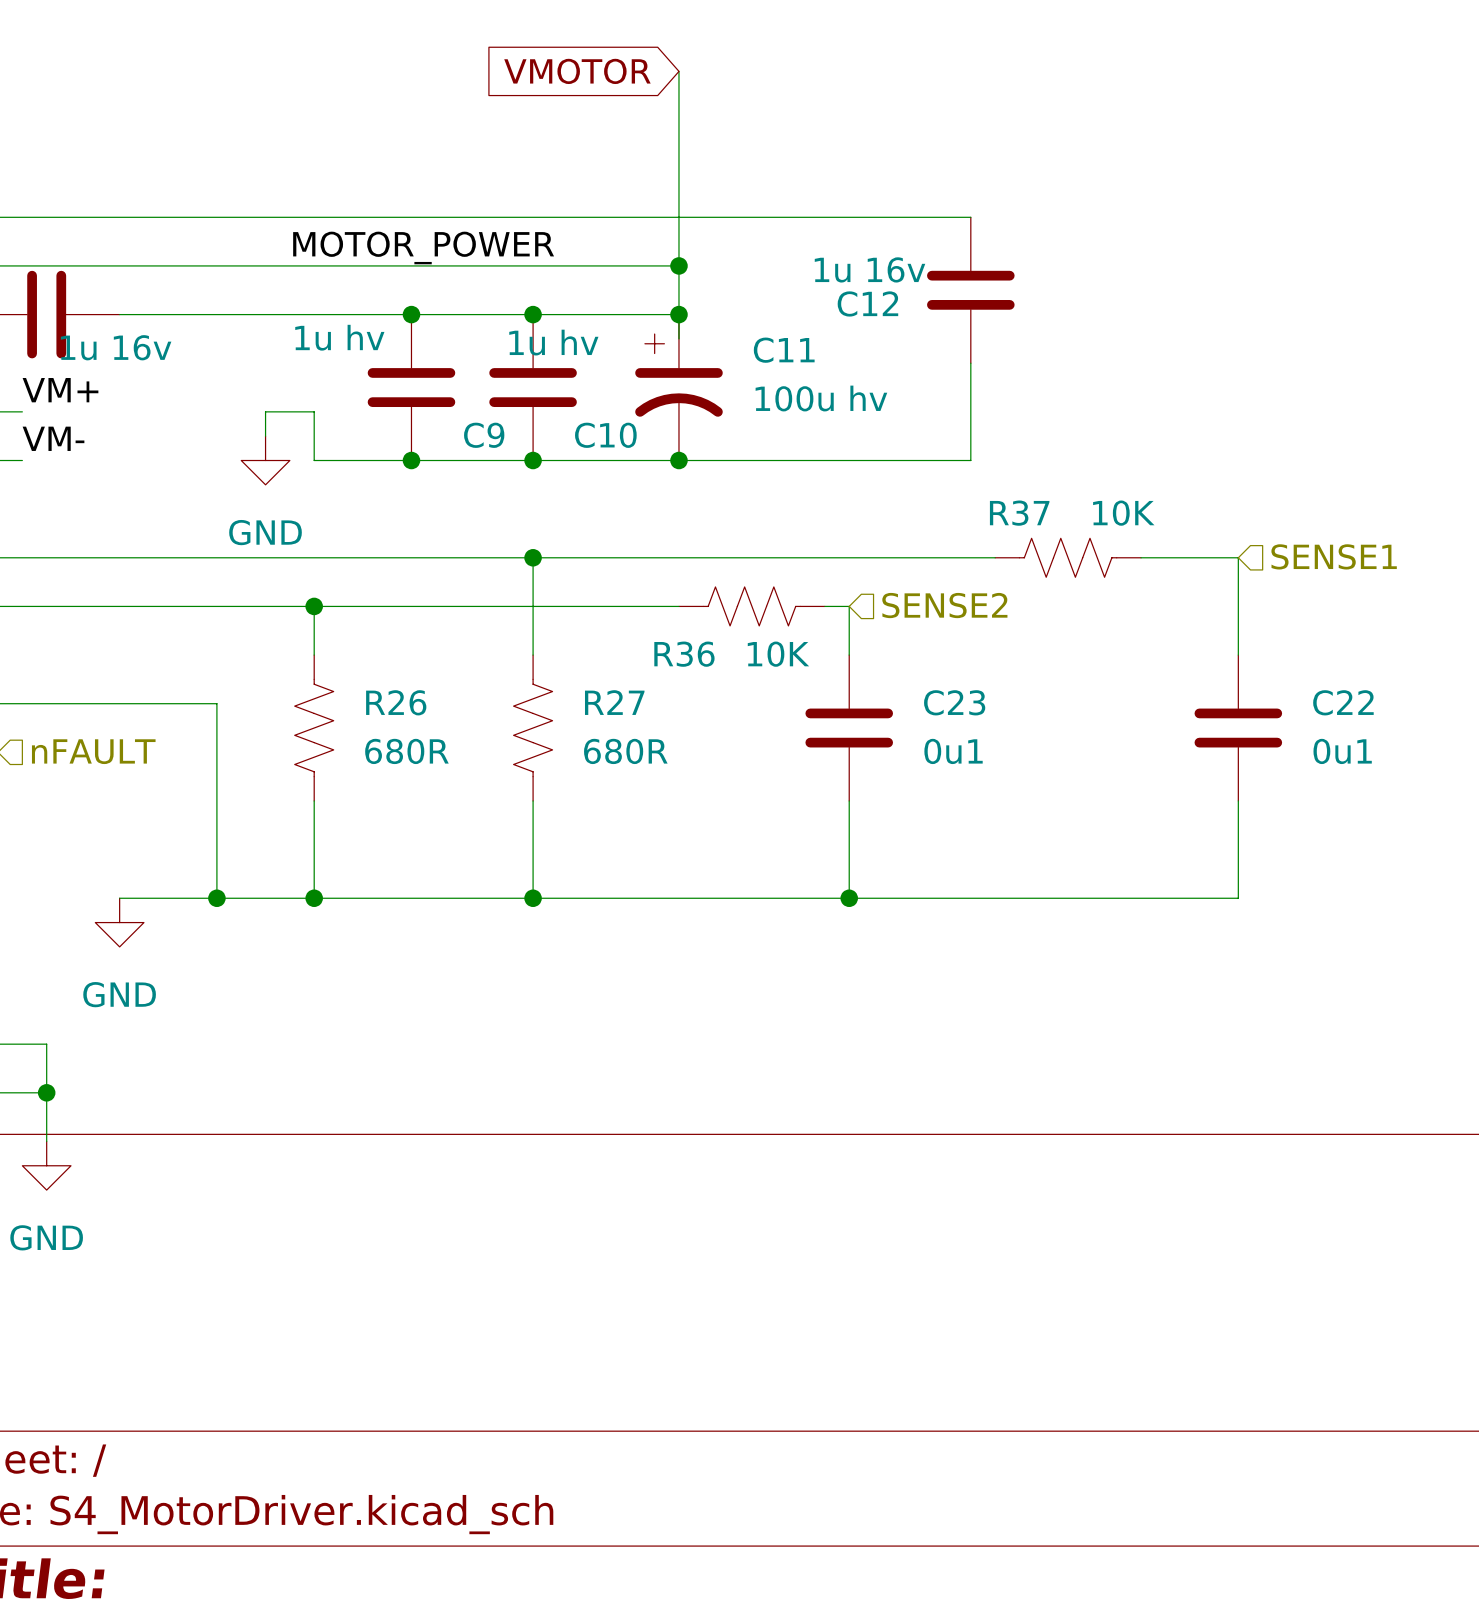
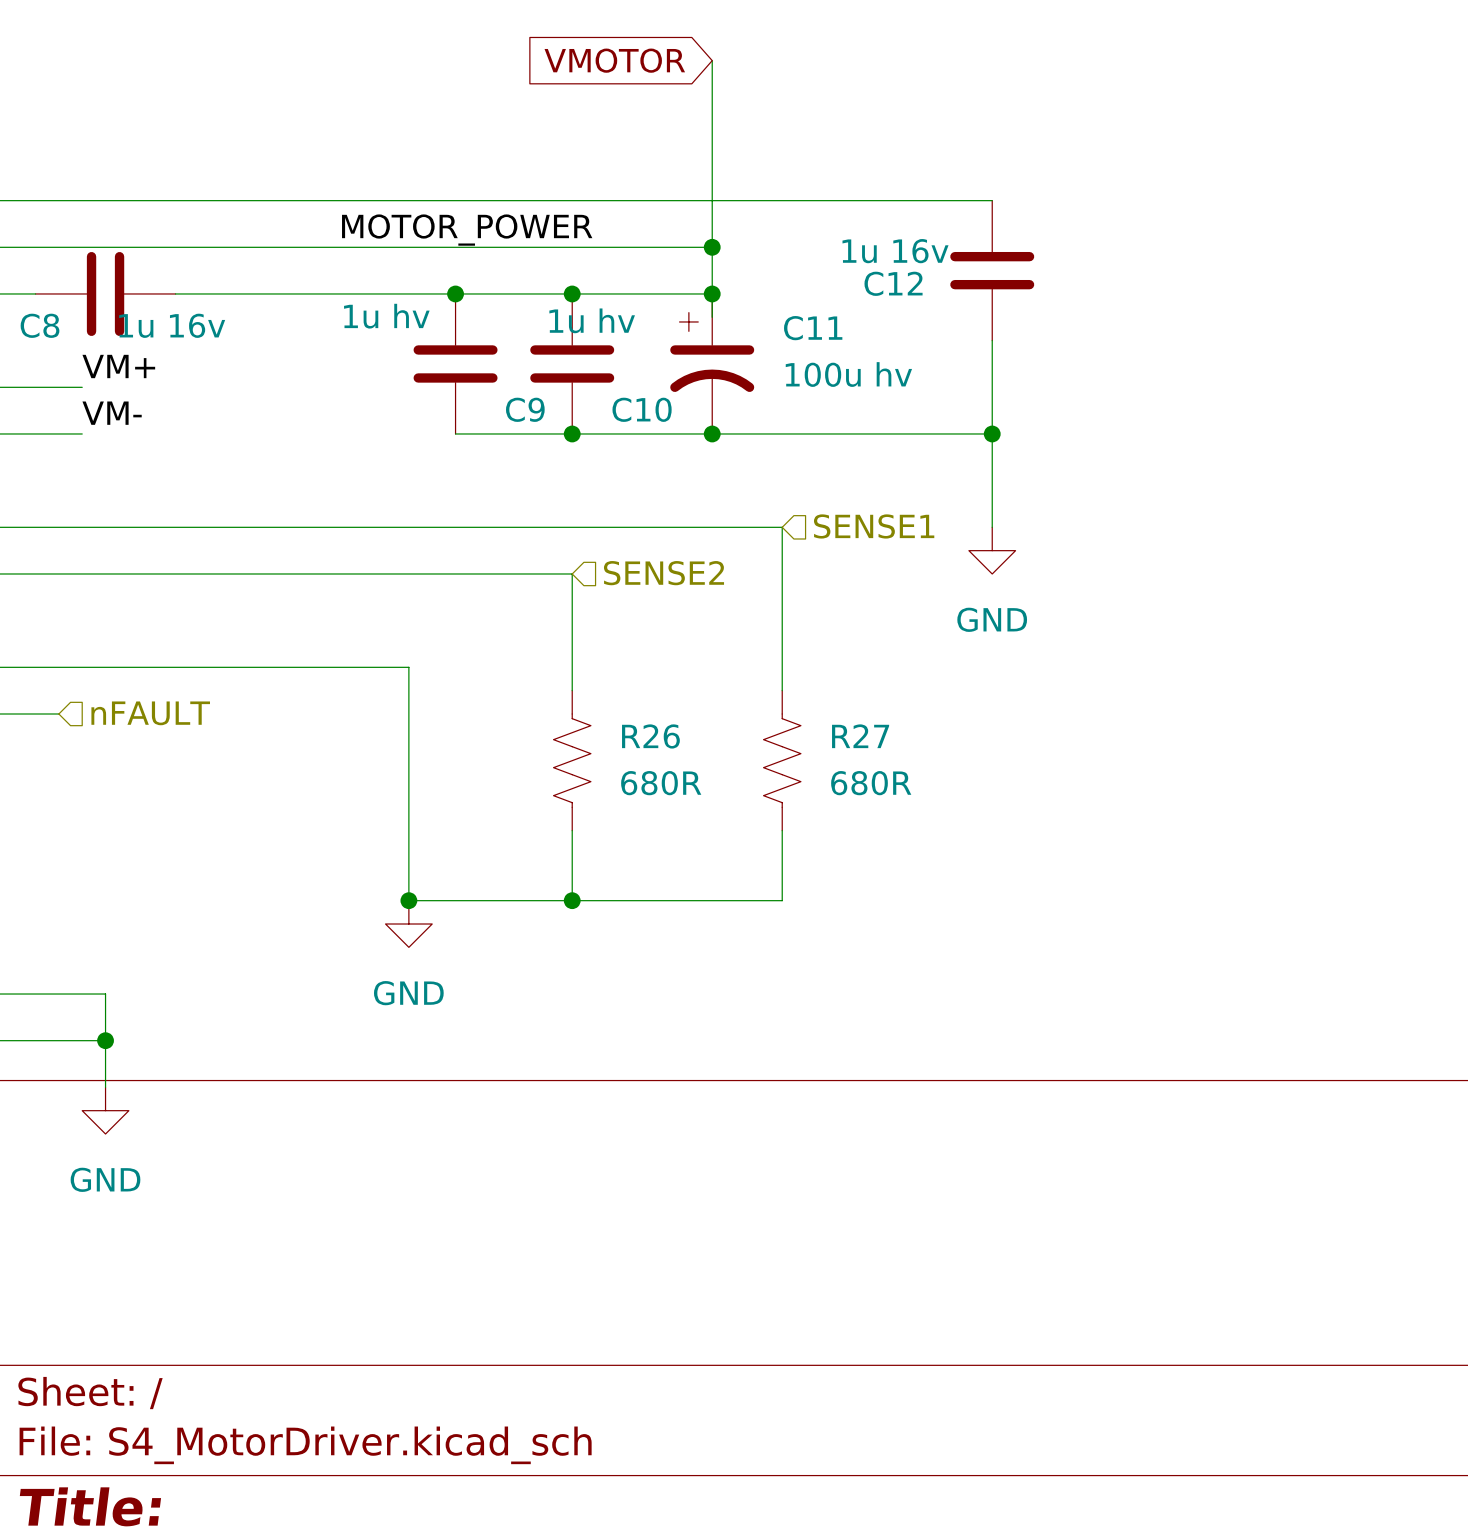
wire: (265, 436) (265, 411) (314, 411) (314, 460) (411, 460) -> none
power symbol: GND (265, 460) -> none
junction: (411, 460) -> none
junction: none -> (992, 433)
hierarchical label: none -> SENSE1 (874, 526)
hierarchical label: SENSE1 (1334, 556) -> none
wire: (533, 557) (533, 606) (678, 606) -> none
junction: (533, 557) -> none
wire: (751, 557) (995, 557) -> (782, 527) (782, 690)
R37: 10K (1068, 557) -> none
wire: (1141, 557) (1238, 557) (1238, 655) -> none
power symbol: none -> GND (992, 550)
hierarchical label position: SENSE2 (944, 605) -> SENSE2 (664, 573)
wire: (314, 606) (314, 655) -> (572, 854) (572, 900)
junction: (314, 606) -> none
R36: 10K (751, 606) -> none
wire: (824, 606) (849, 606) (849, 655) -> none
wire: (216, 703) (216, 898) -> (268, 667) (408, 667) (408, 900) (782, 900) (782, 830)
R26 position: (314, 728) -> (572, 760)
R27 position: (533, 728) -> (782, 760)
C23: 0u1 (849, 728) -> none
C22: 0u1 (1238, 728) -> none
wire: (314, 800) (314, 898) -> none
wire: (533, 800) (533, 873) -> (572, 620) (572, 690)
wire: (849, 800) (849, 898) -> (992, 433) (992, 527)
wire: (1238, 800) (1238, 898) (119, 898) -> none
junction: (216, 898) -> none
junction position: (314, 898) -> (408, 900)
junction position: (533, 898) -> (572, 900)
junction: (849, 898) -> none
power symbol position: GND (119, 922) -> GND (408, 924)

